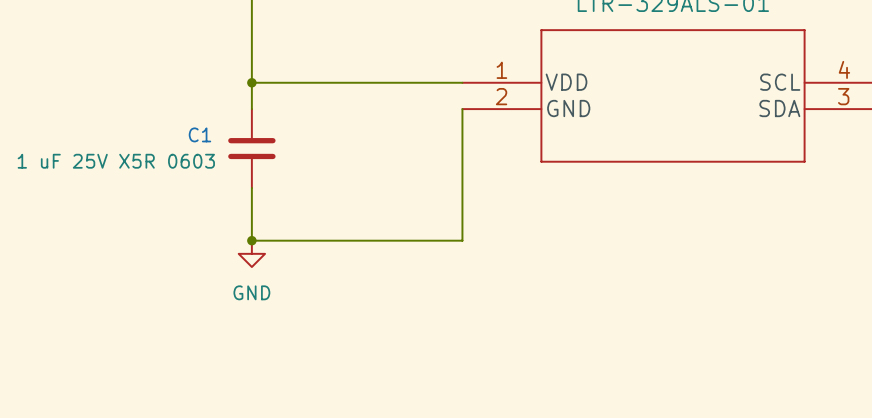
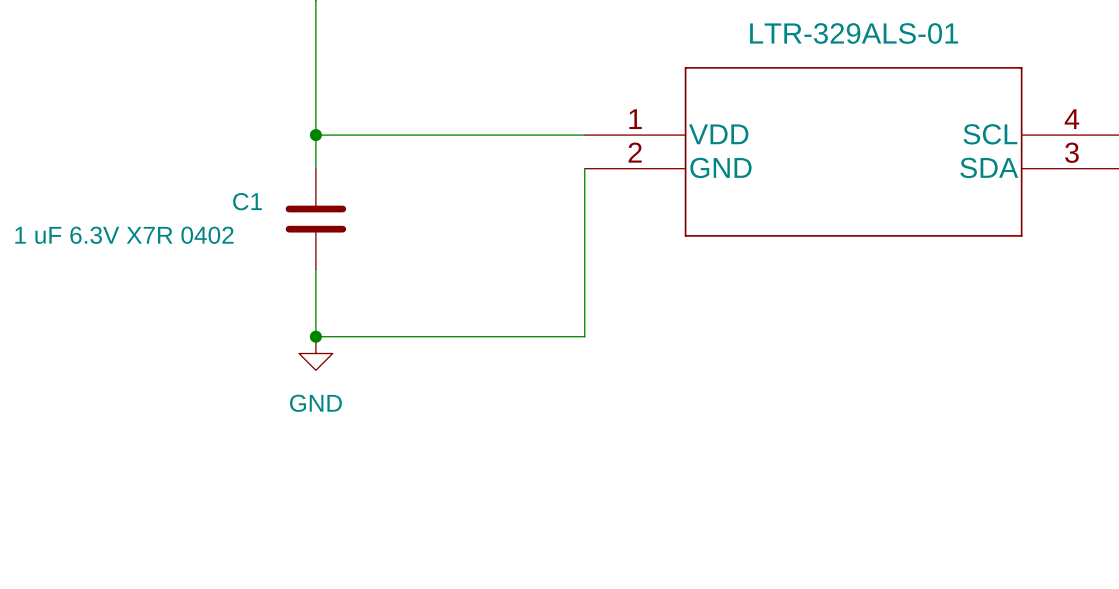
C1 value: 1 uF 25V X5R 0603 (116, 161) -> 1 uF 6.3V X7R 0402 (124, 235)

